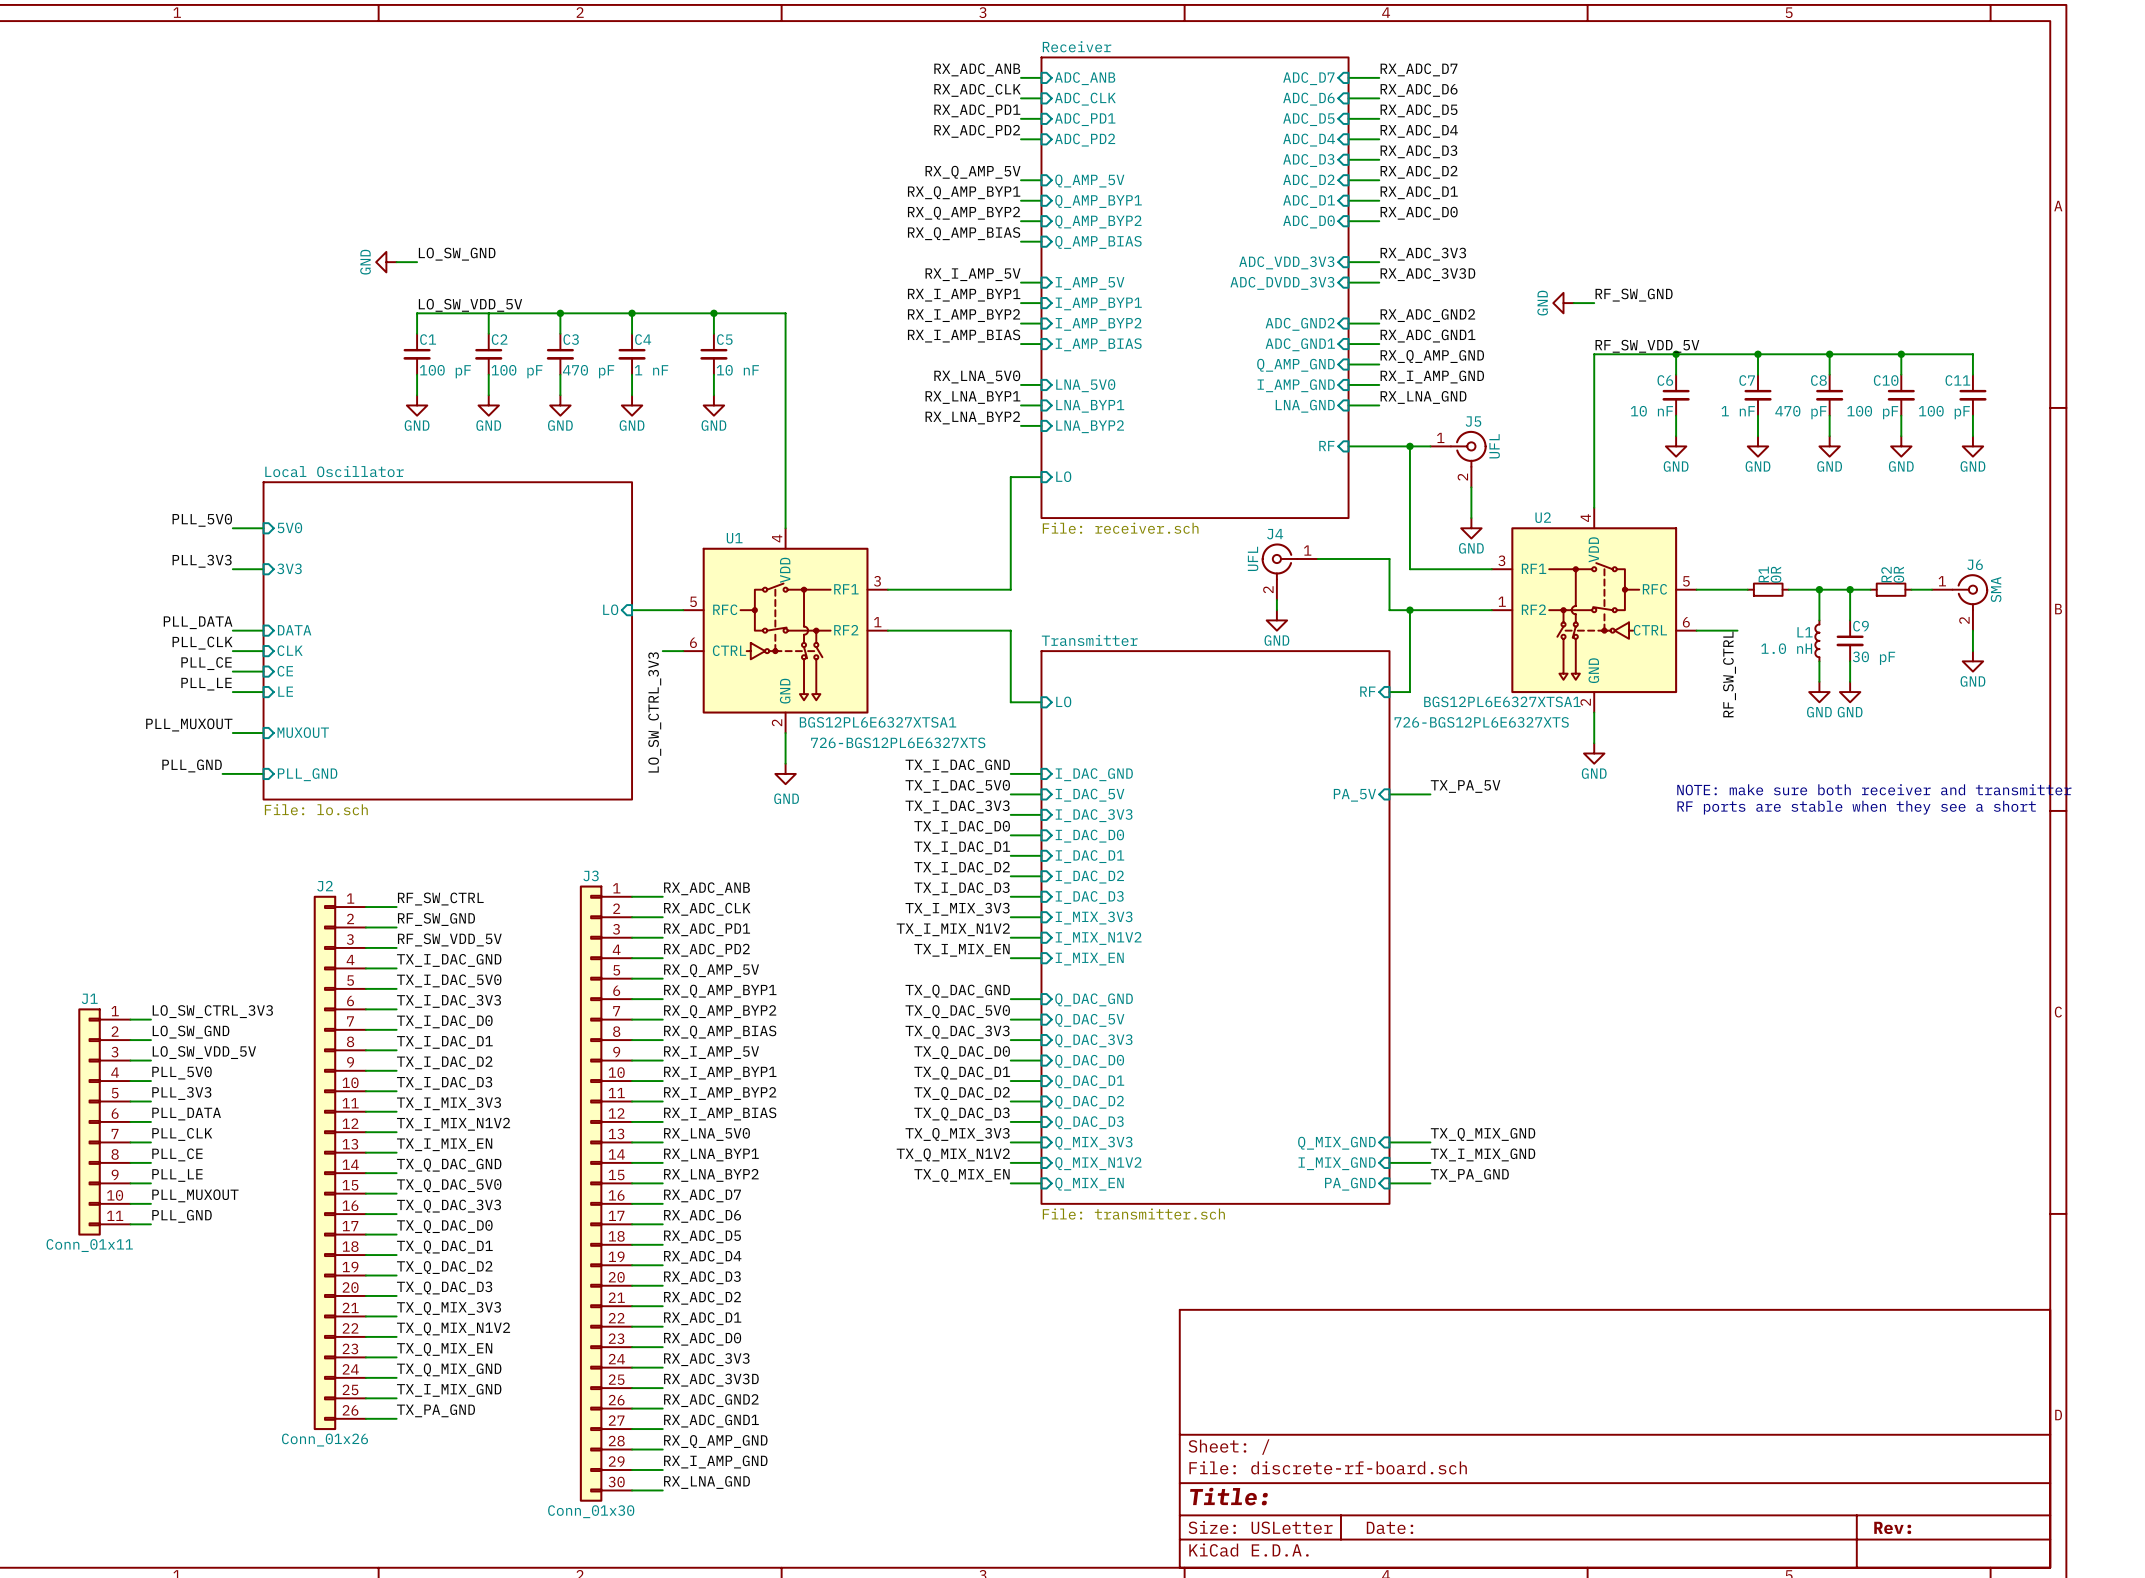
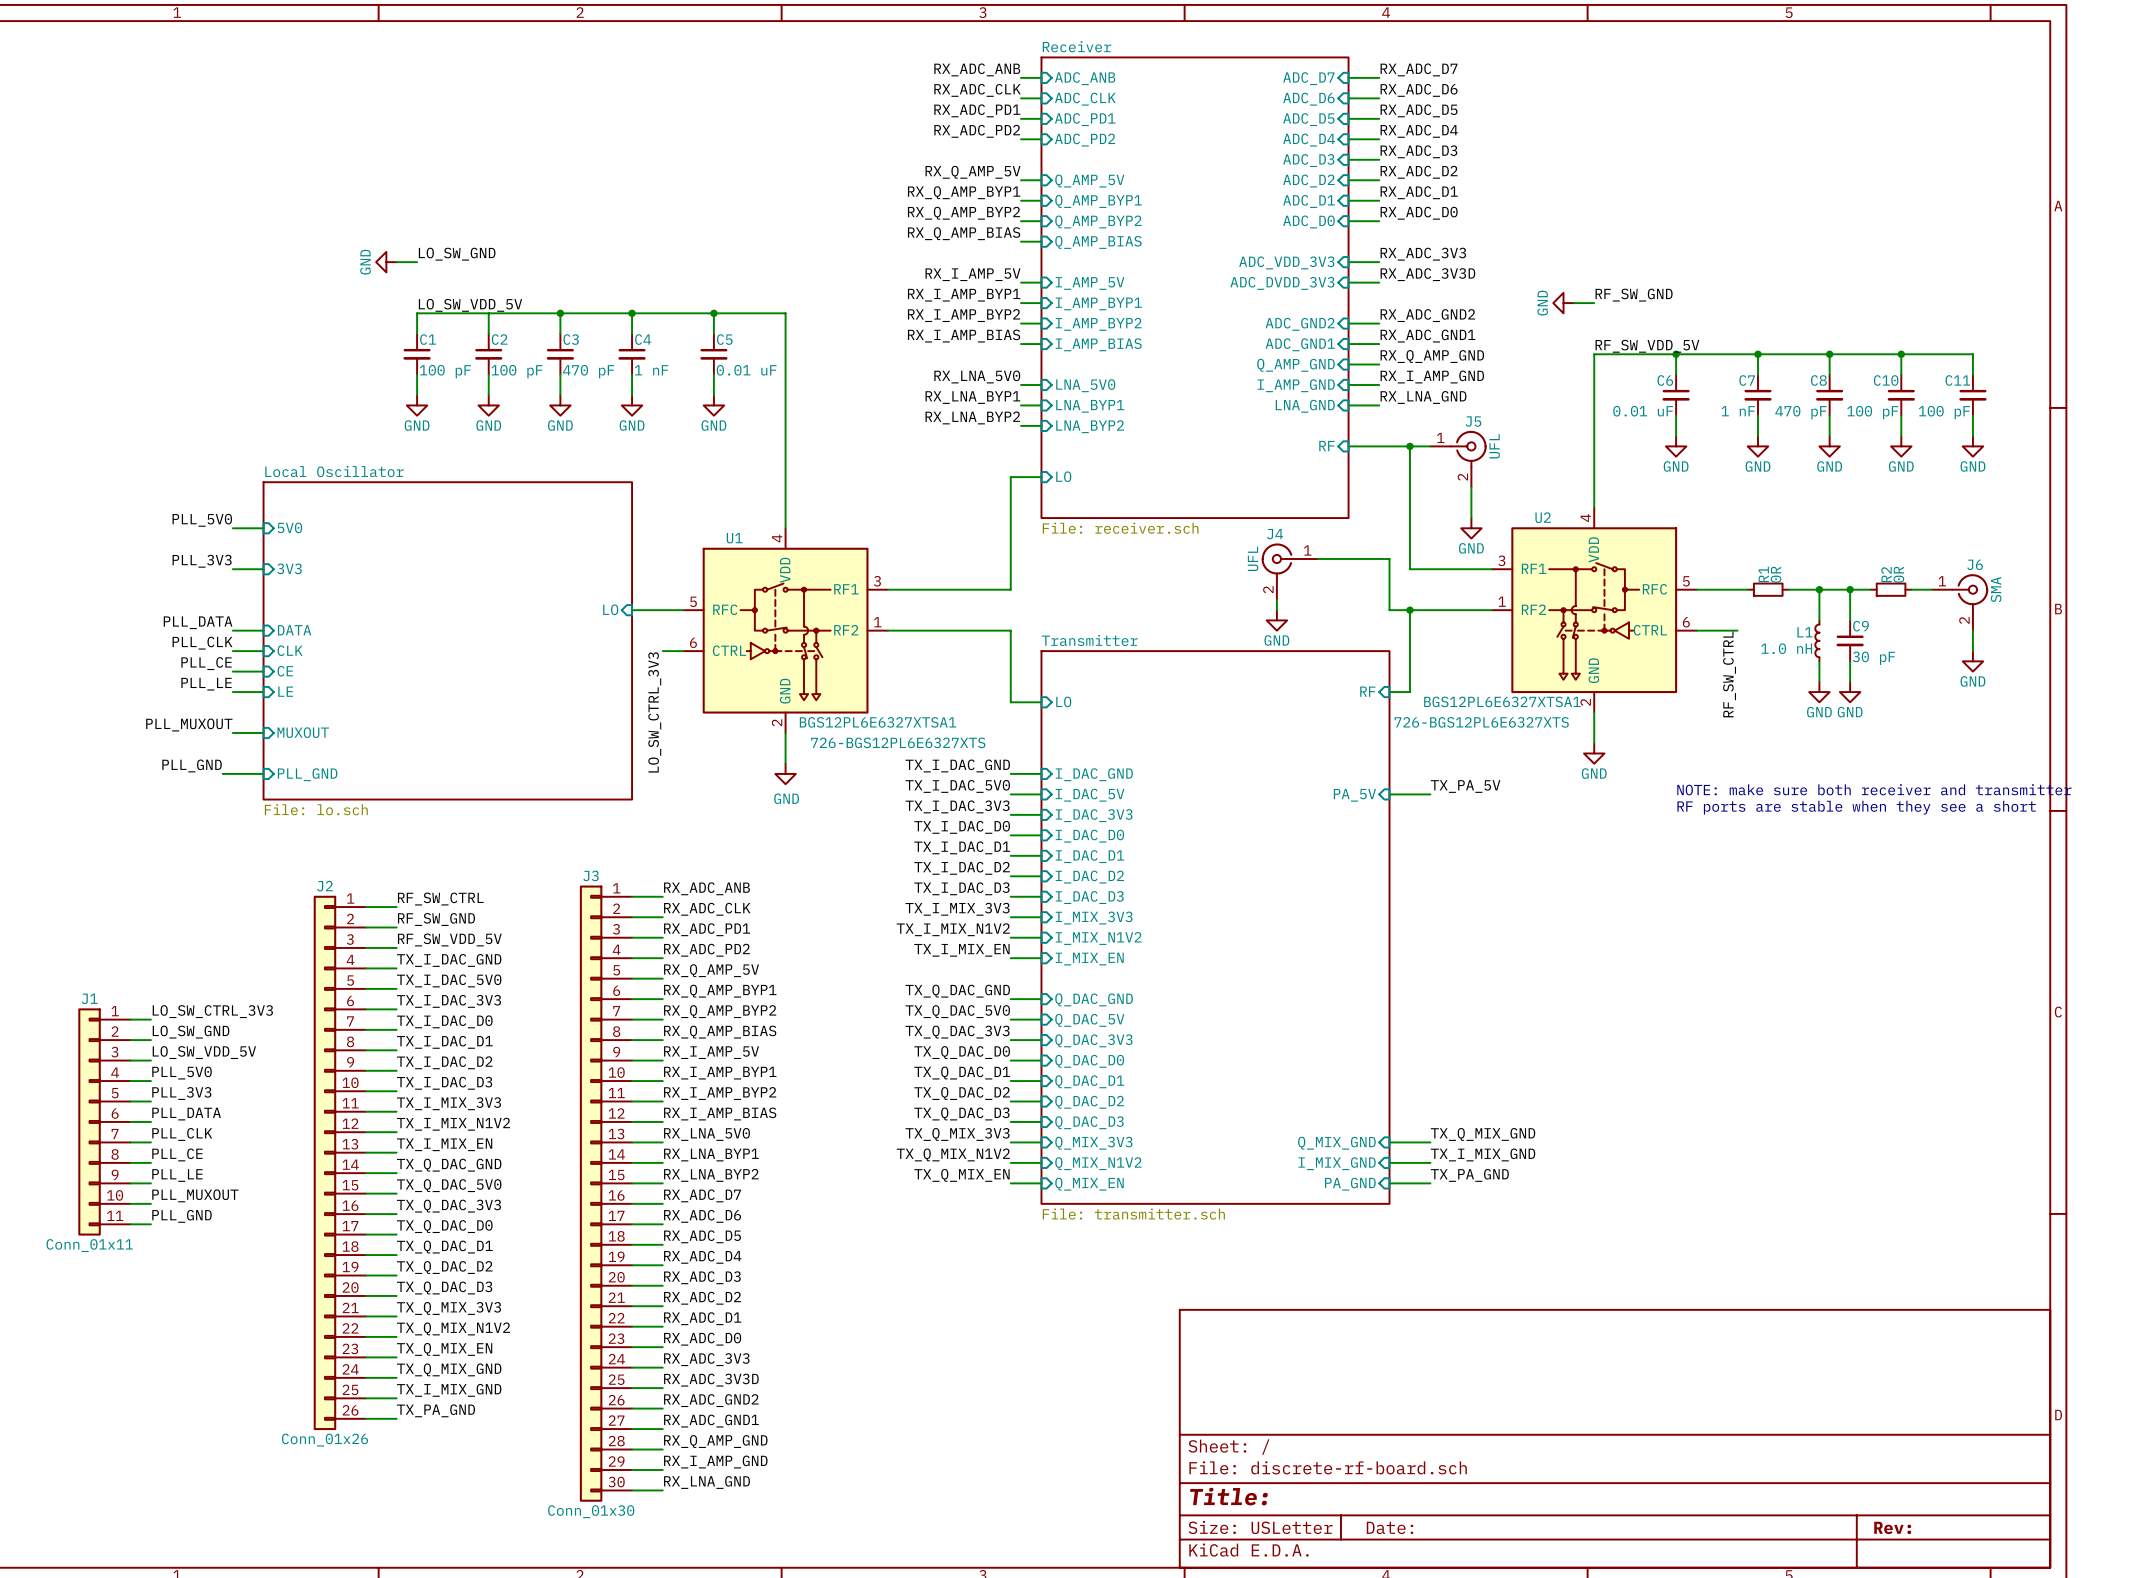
C5 value: 10 nF (737, 370) -> 0.01 uF (746, 370)
C6 value: 10 nF (1651, 411) -> 0.01 uF (1643, 411)

